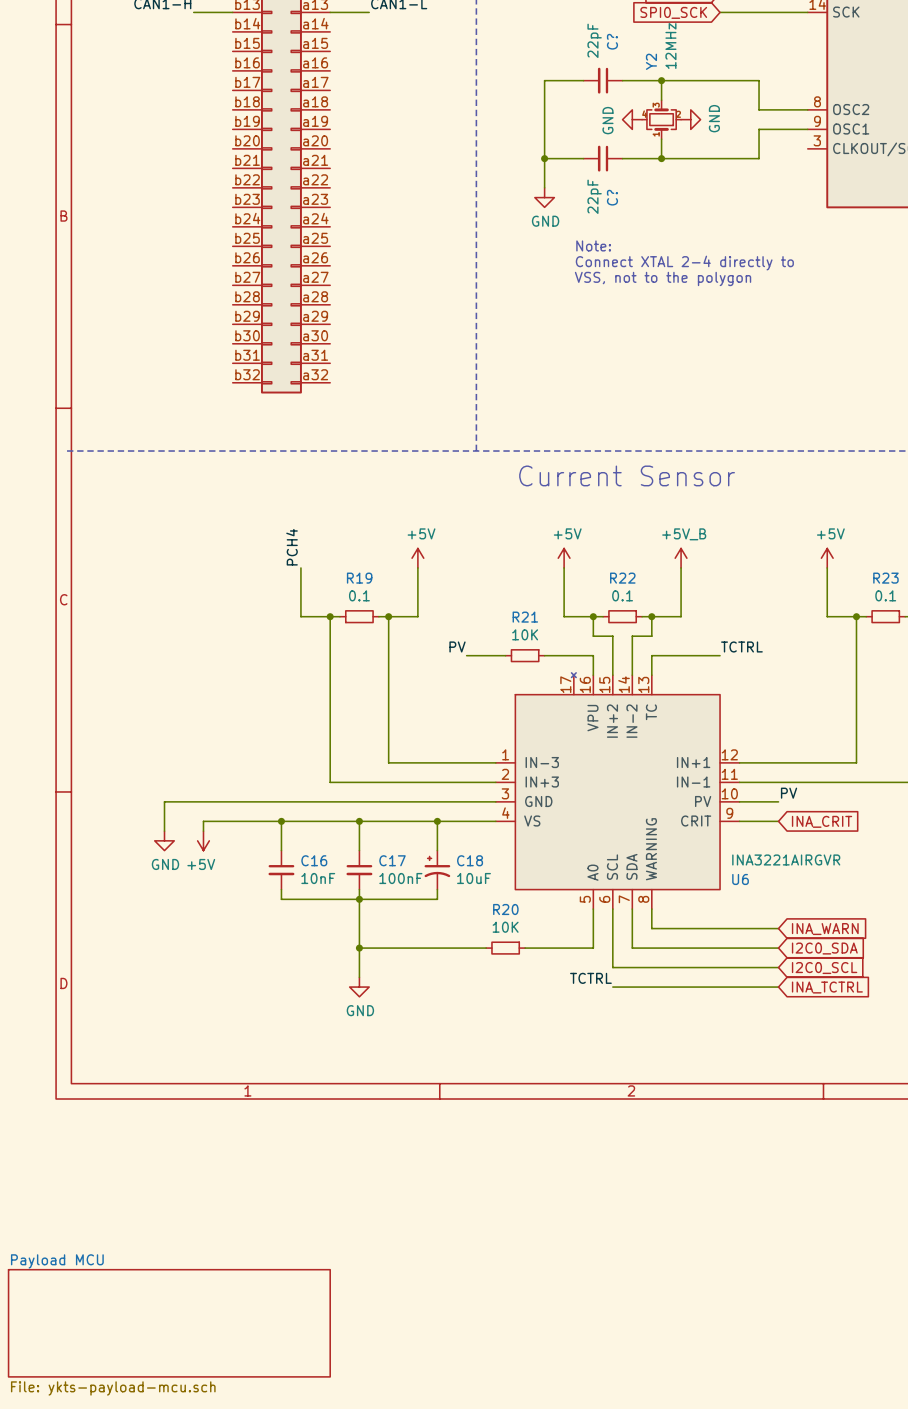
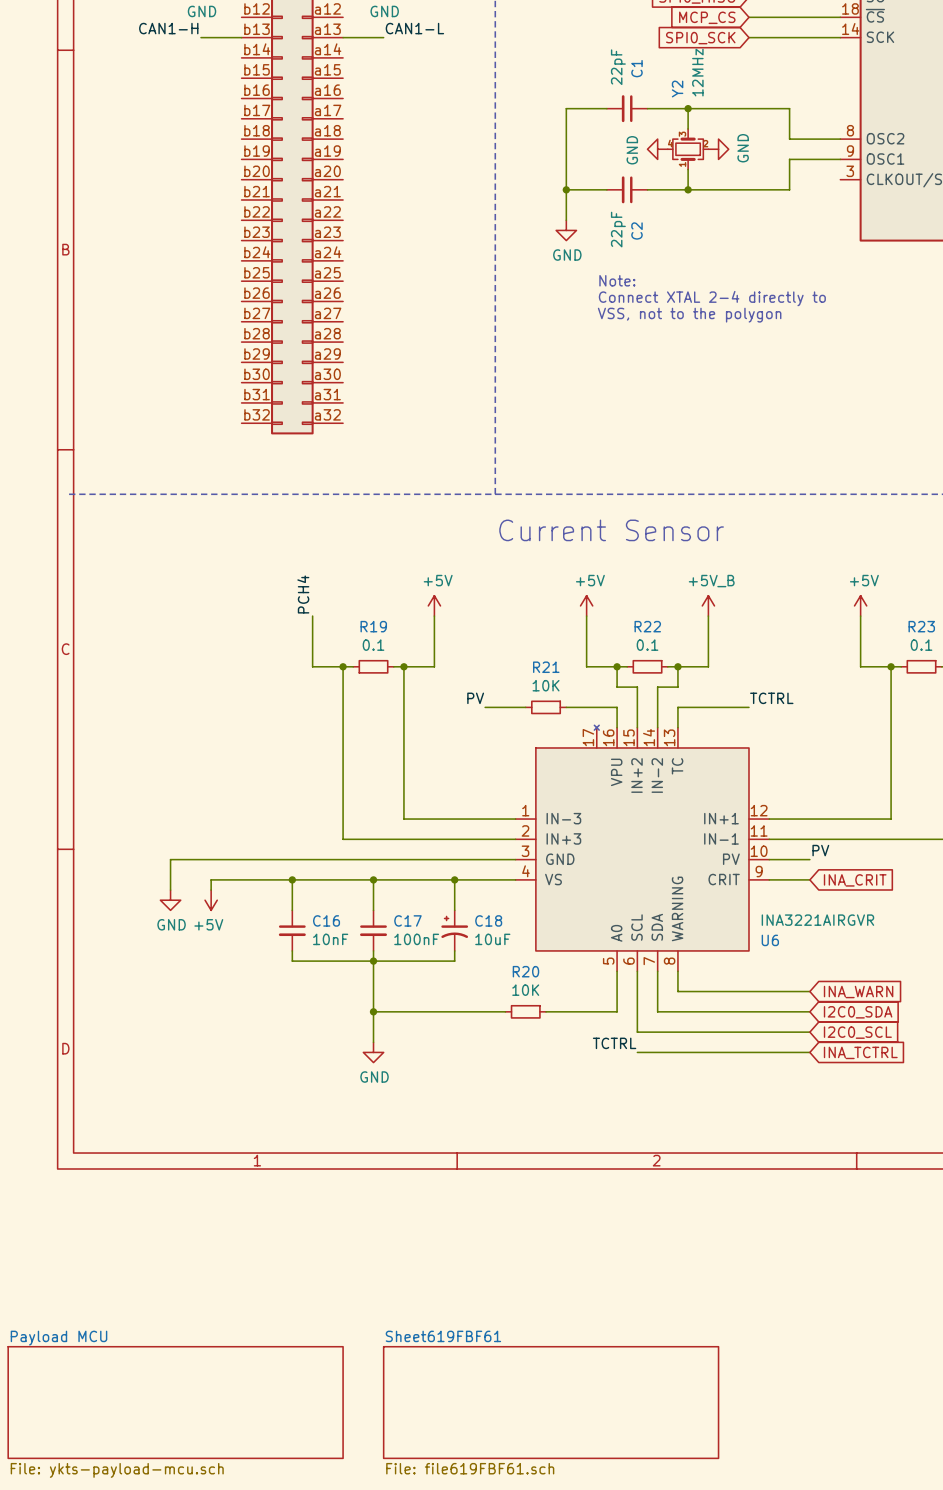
C? name: C? (612, 41) -> C1 (636, 68)
C? name: C? (612, 197) -> C2 (636, 230)
text position: Current Sensor (627, 475) -> Current Sensor (611, 530)
sheet Sheet619FBF61: none -> File: file619FBF61.sch (551, 1402)

